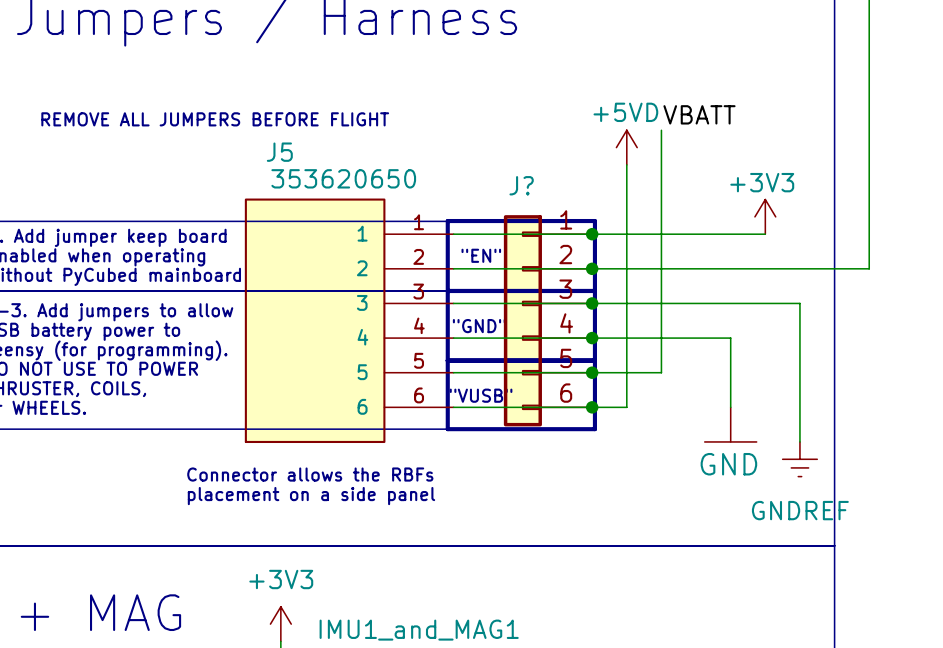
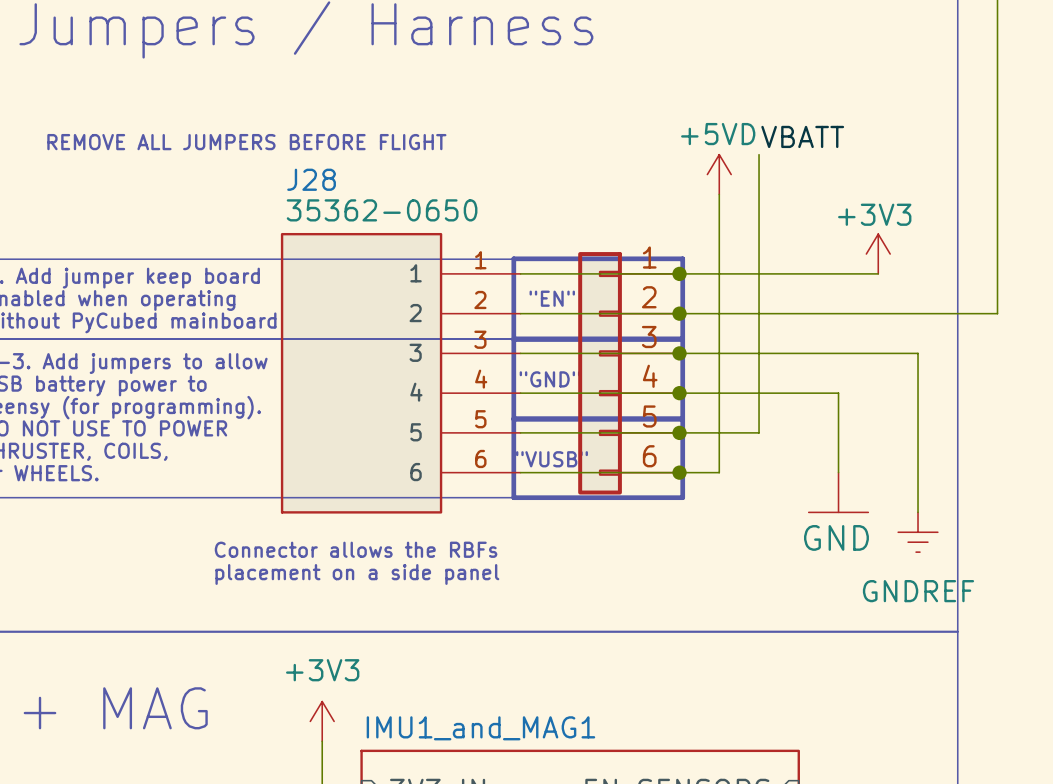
J5 name: J5 (279, 152) -> J28 (311, 179)
J5 value: 353620650 (343, 178) -> 35362-0650 (382, 210)
J? name: J? (521, 185) -> none

